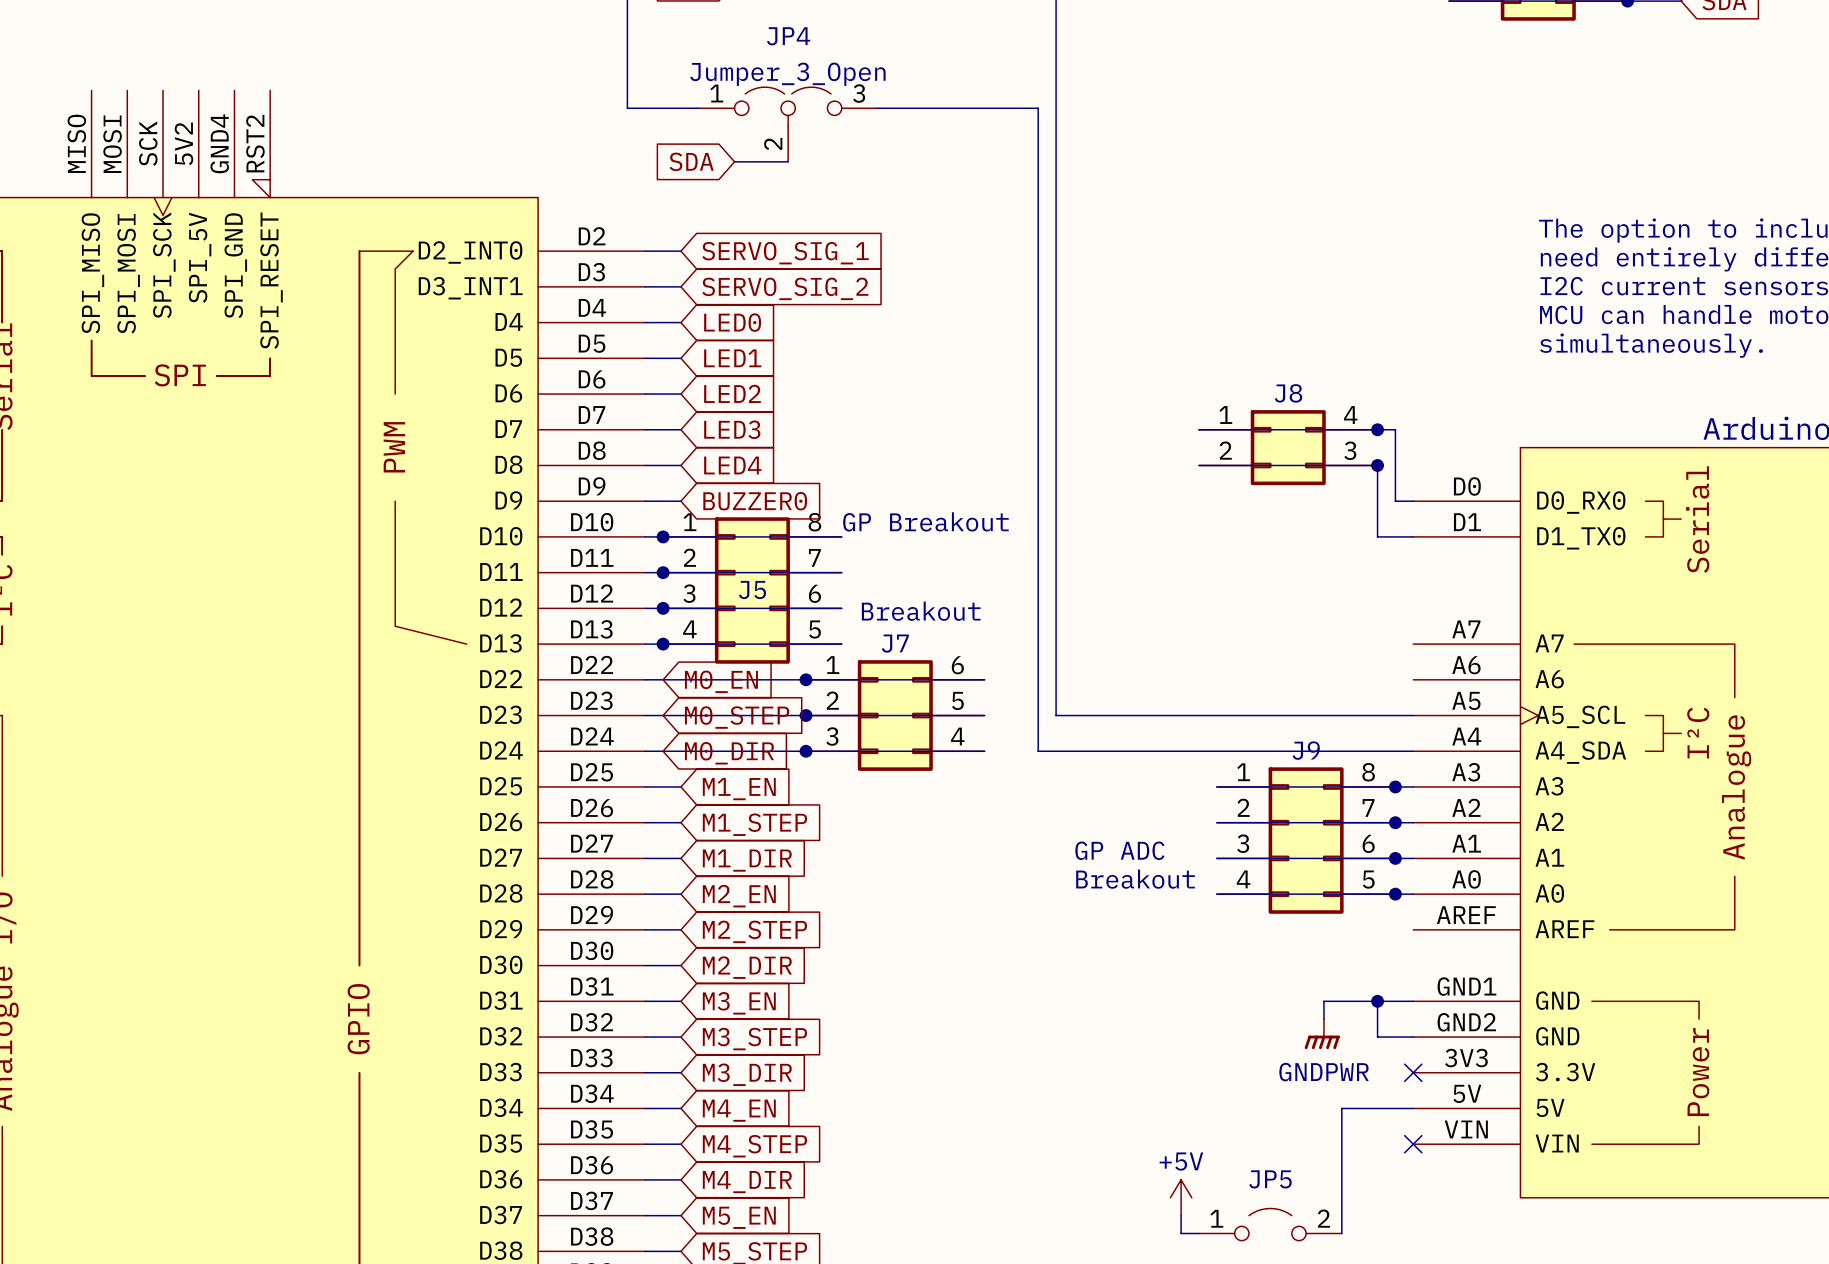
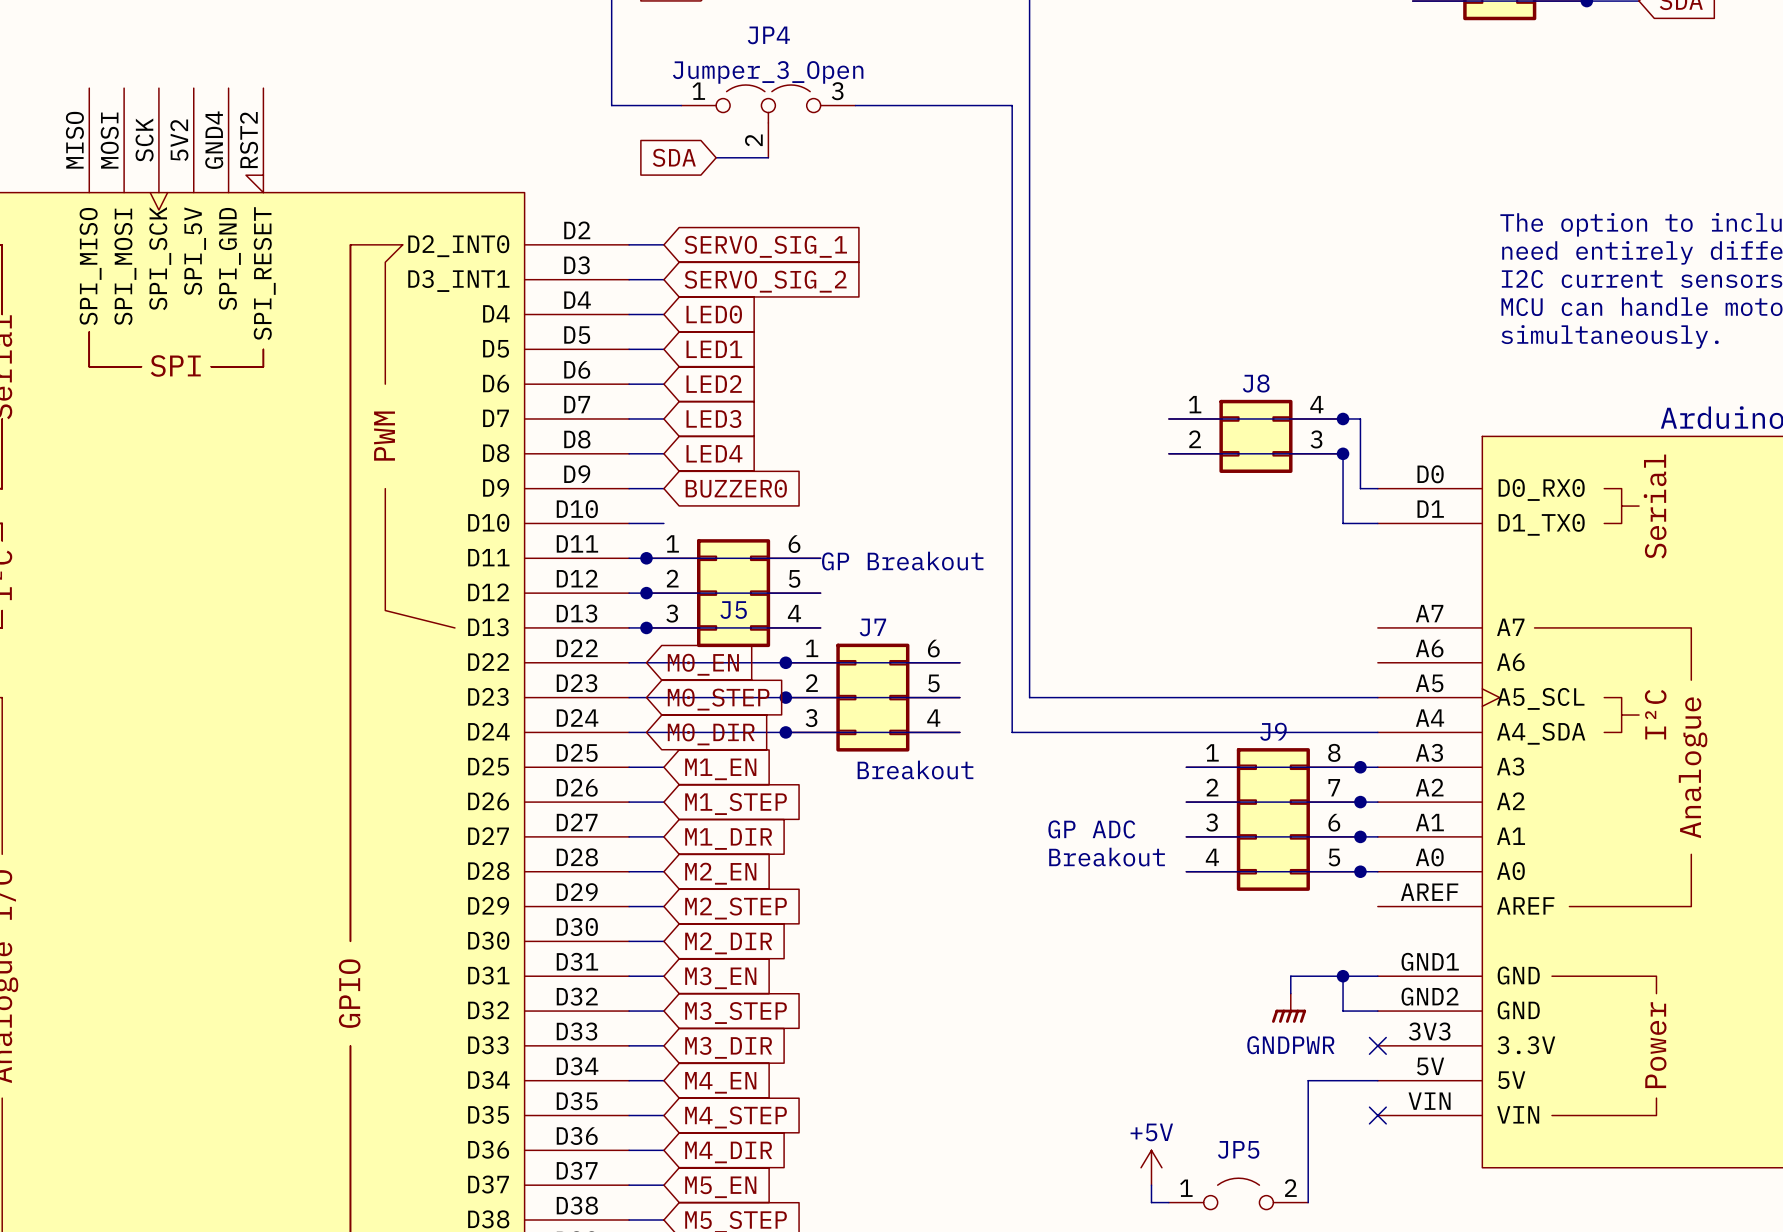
J5 symbol: [663, 517, 842, 664] -> [646, 539, 821, 648]
text position: GP Breakout (925, 521) -> GP Breakout (902, 561)
junction: (663, 536) -> none
wire: (680, 536) (841, 536) -> none
text position: Breakout (921, 611) -> Breakout (915, 770)

